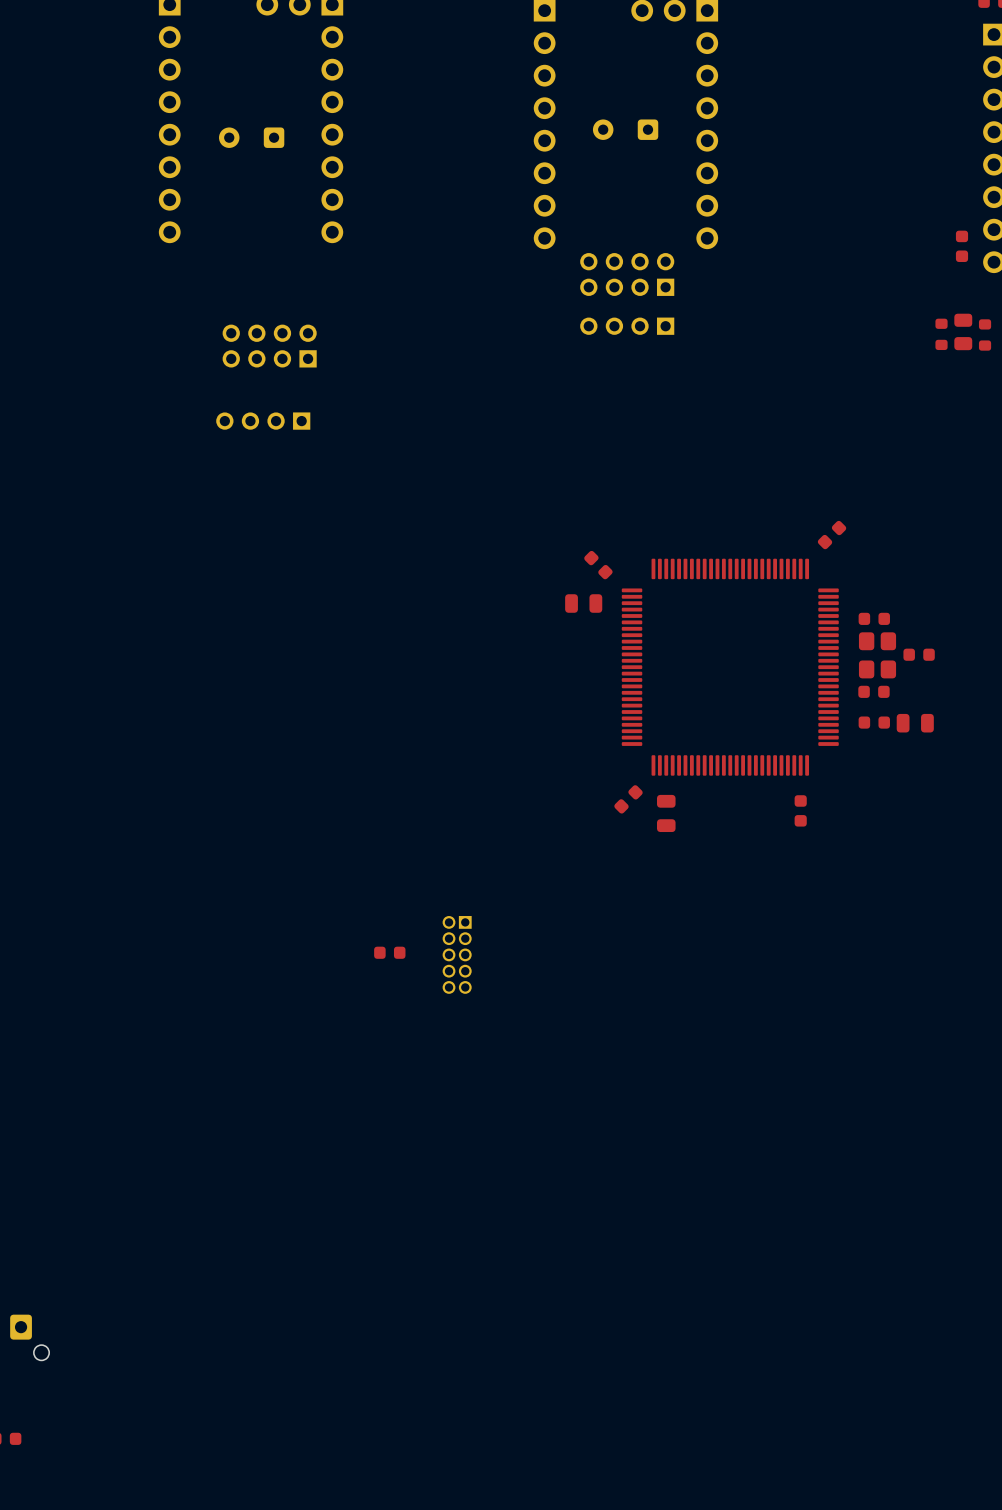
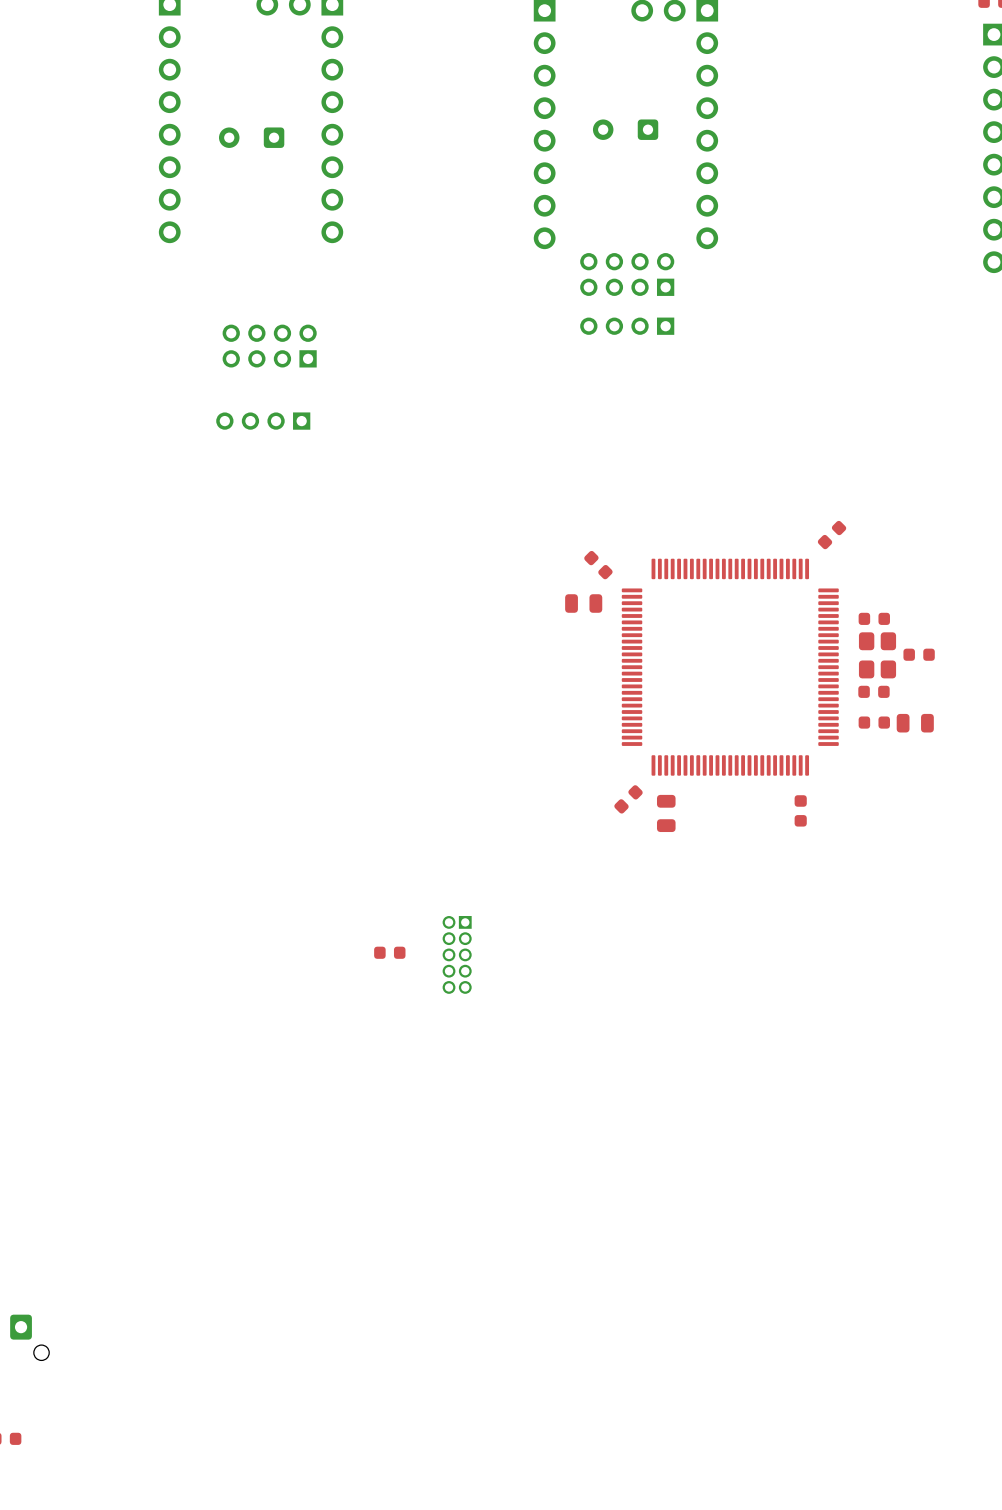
part: (962, 246) -> none
part: (963, 331) -> none
part: (941, 334) -> none
part: (985, 334) -> none

